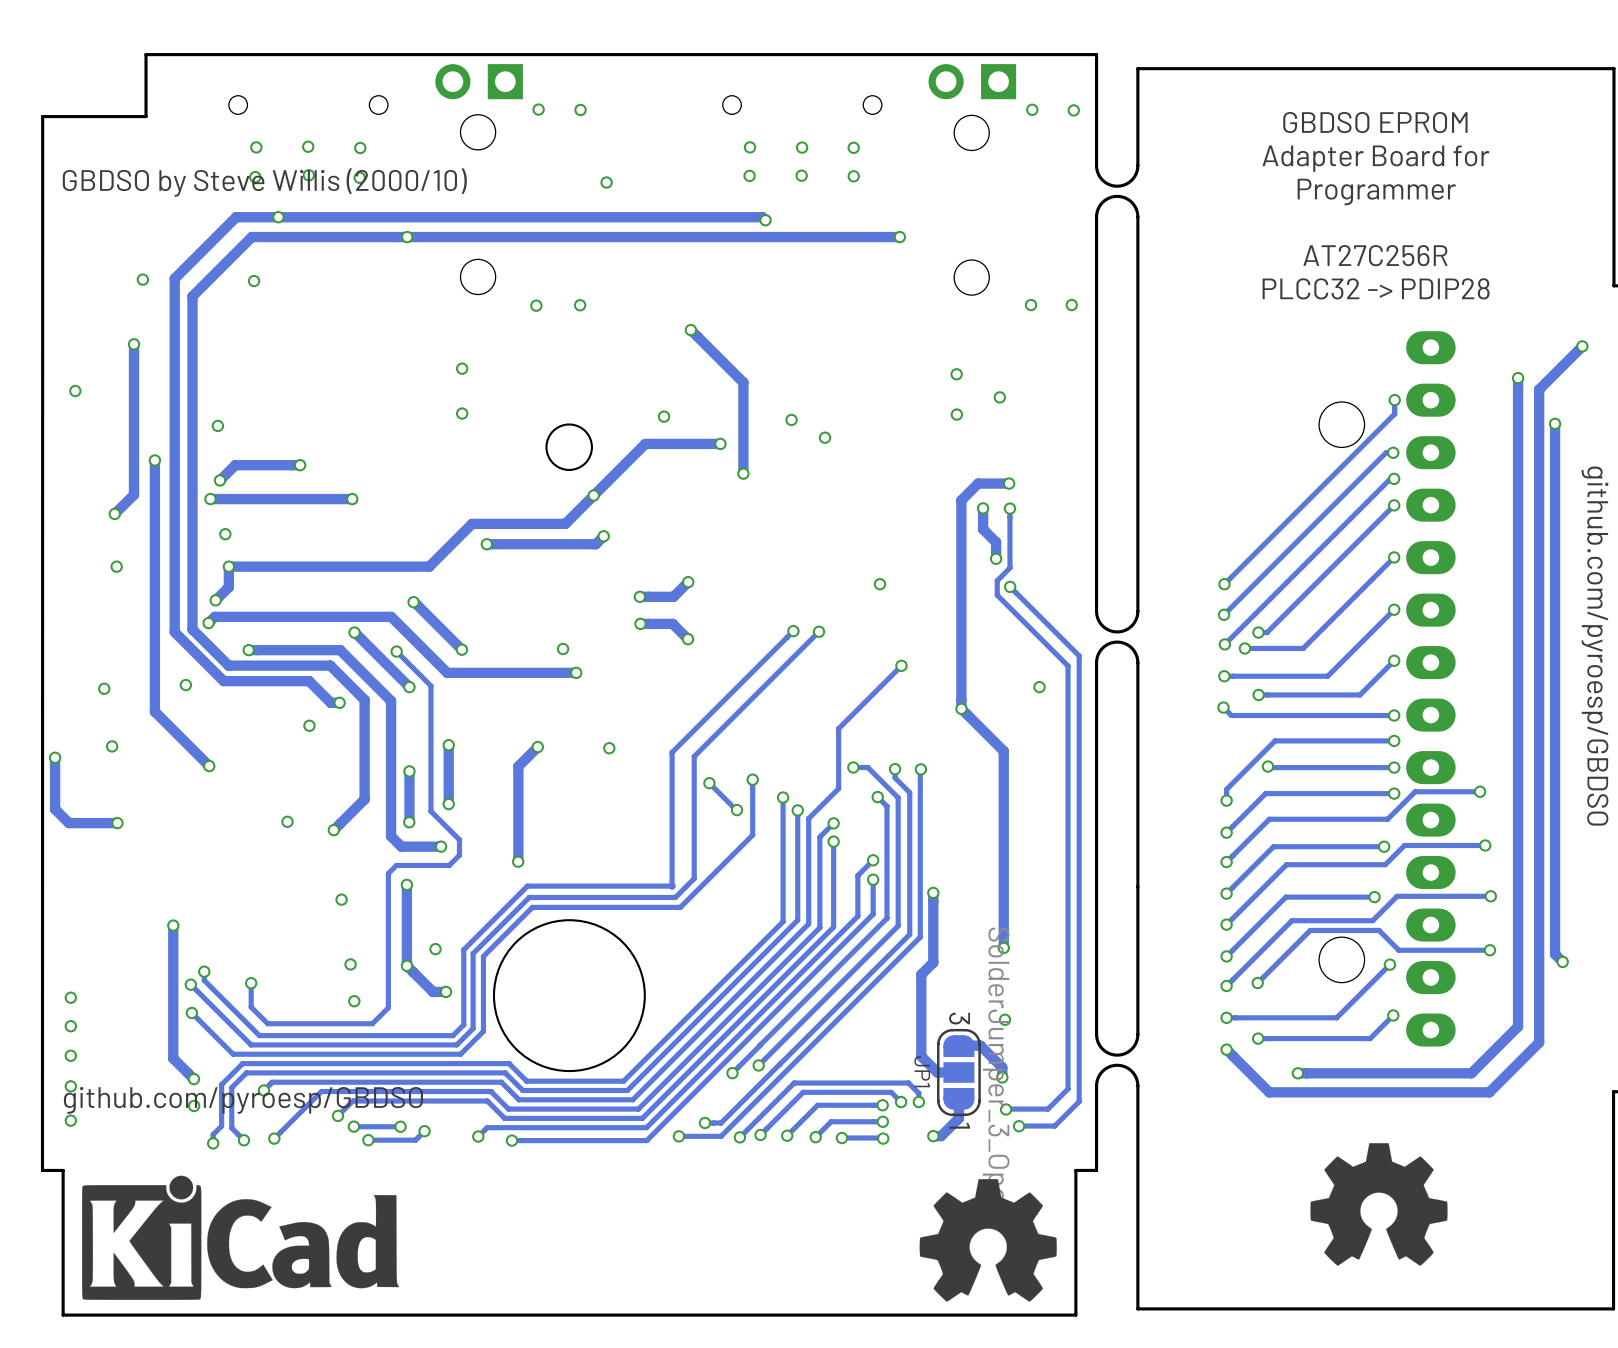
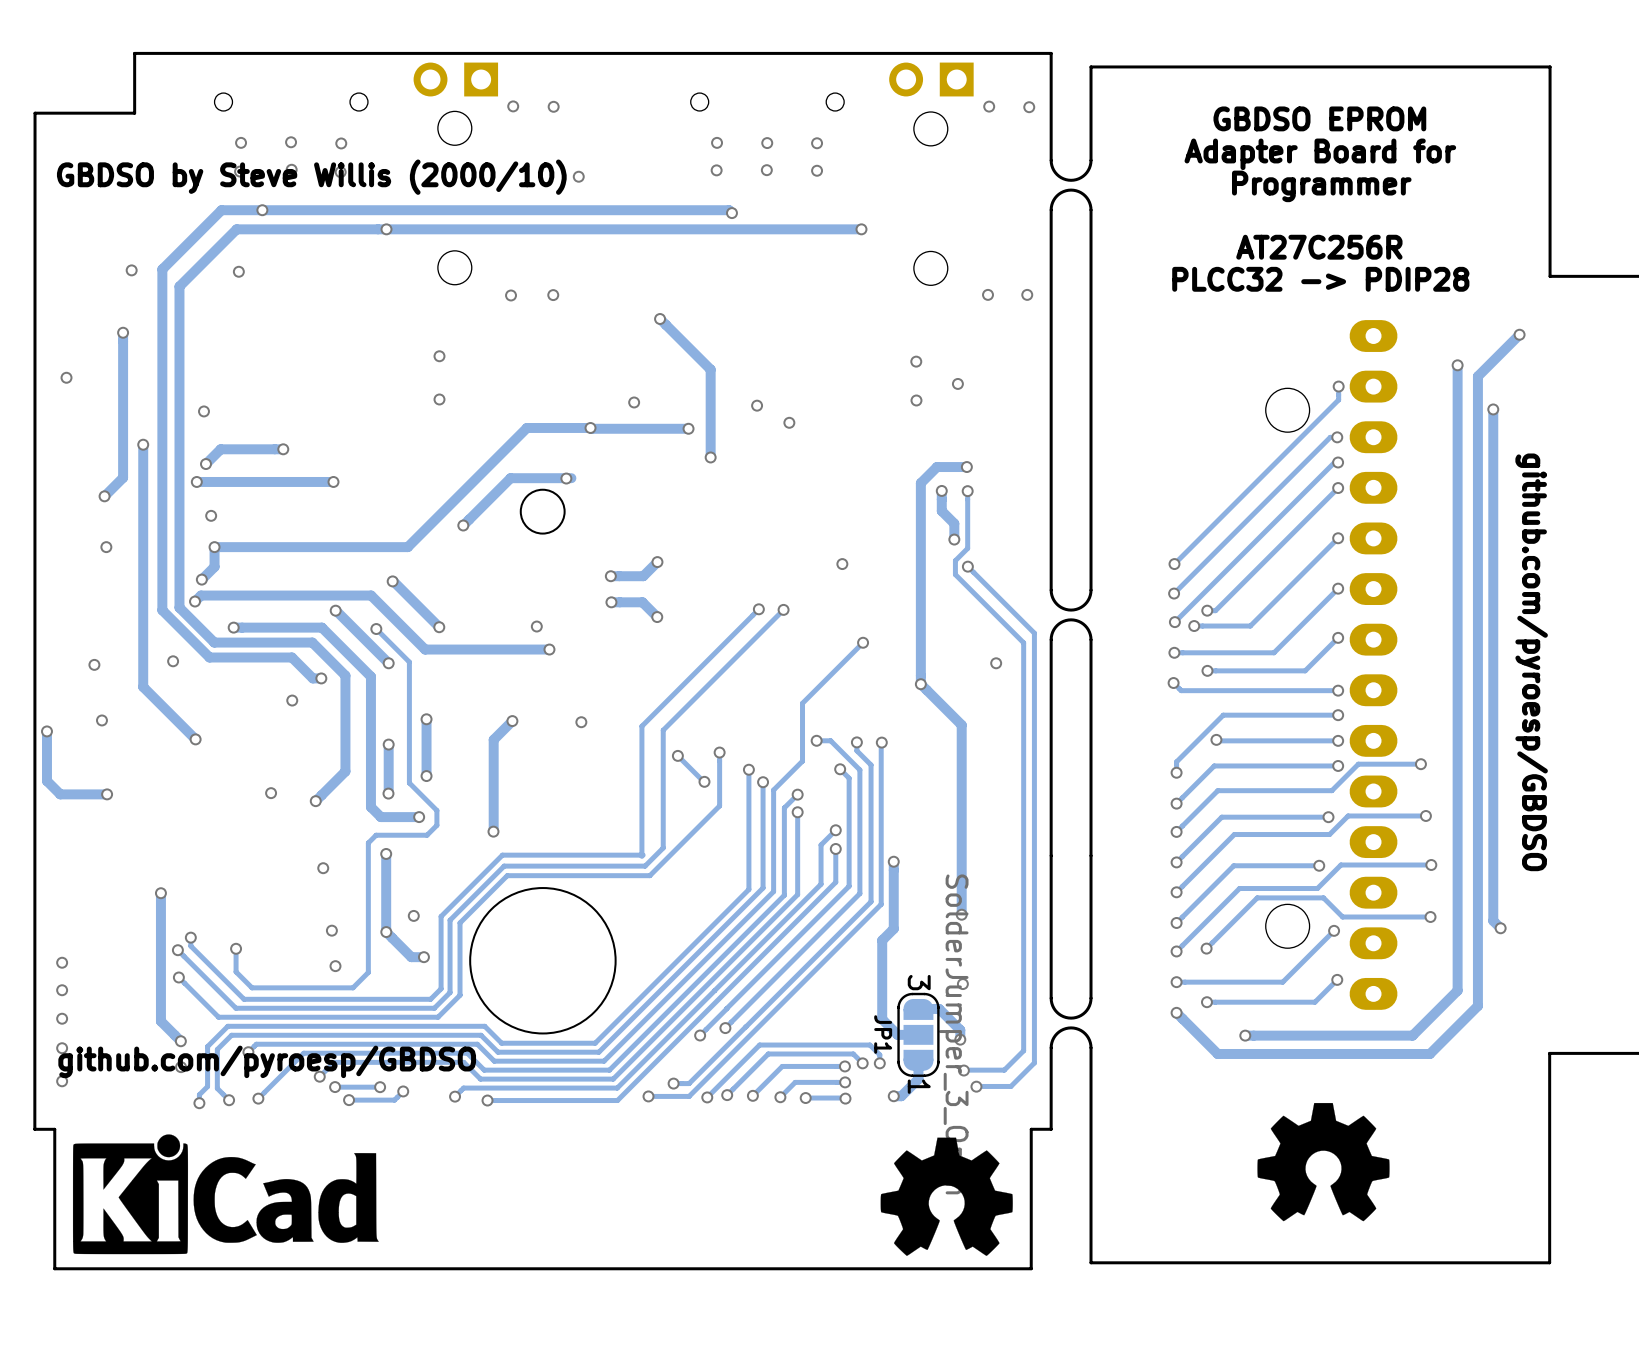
track: (645, 443) (593, 495) -> none
round board edge position: (569, 447) -> (542, 511)
track: (593, 495) (565, 523) (472, 523) -> (616, 428) (526, 427) (449, 505)
track: (603, 536) (595, 544) (486, 544) -> (571, 478) (510, 478) (463, 525)
via position: (603, 536) -> (590, 427)

